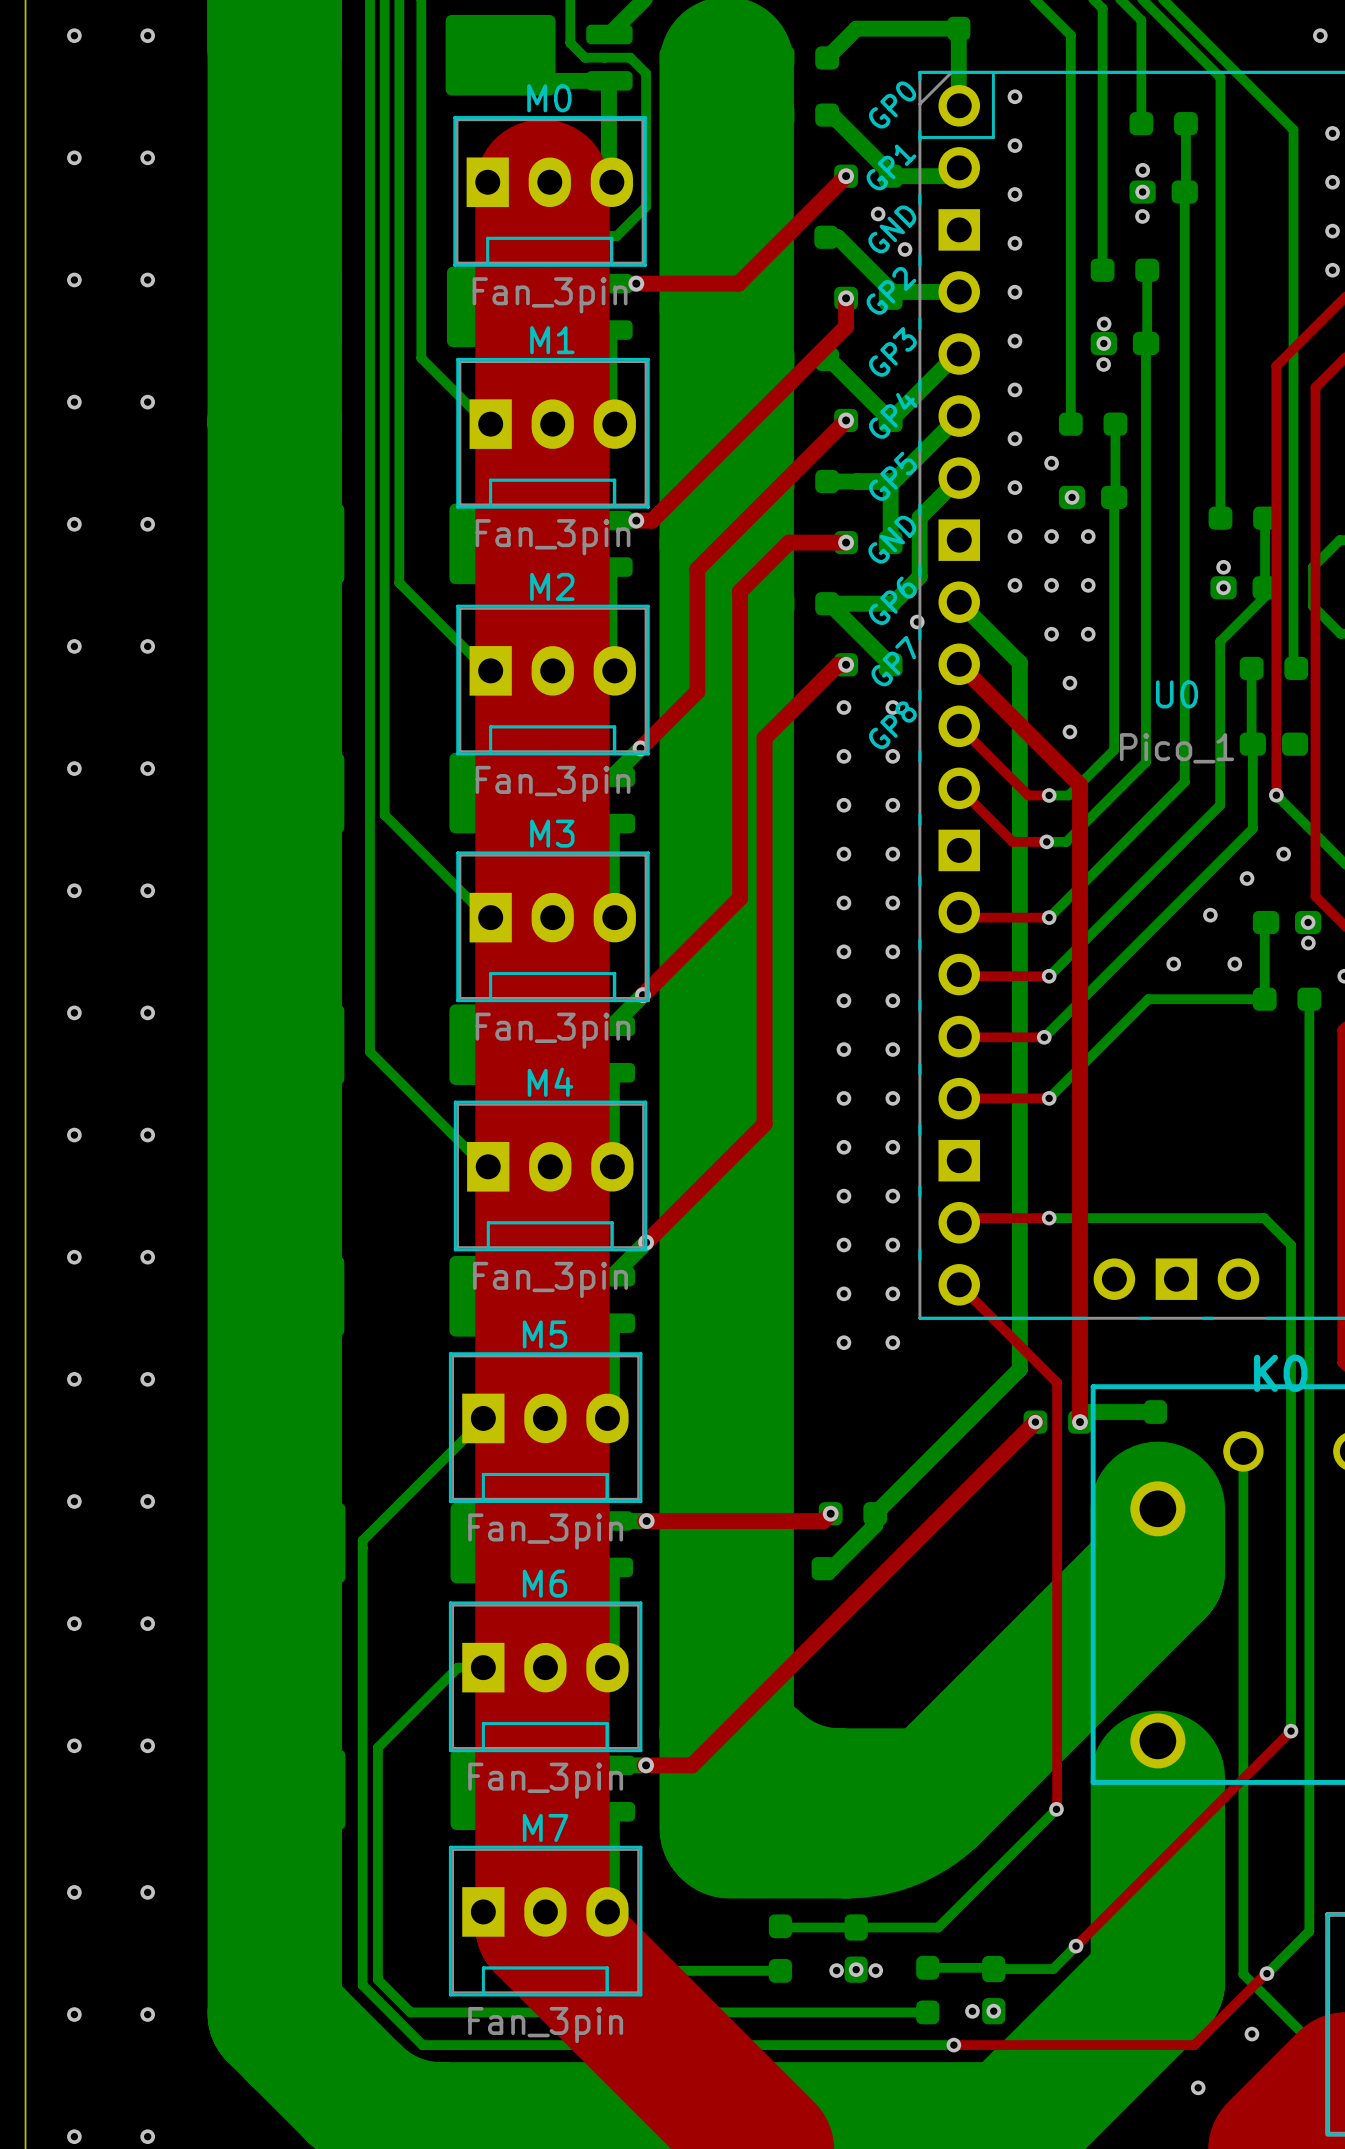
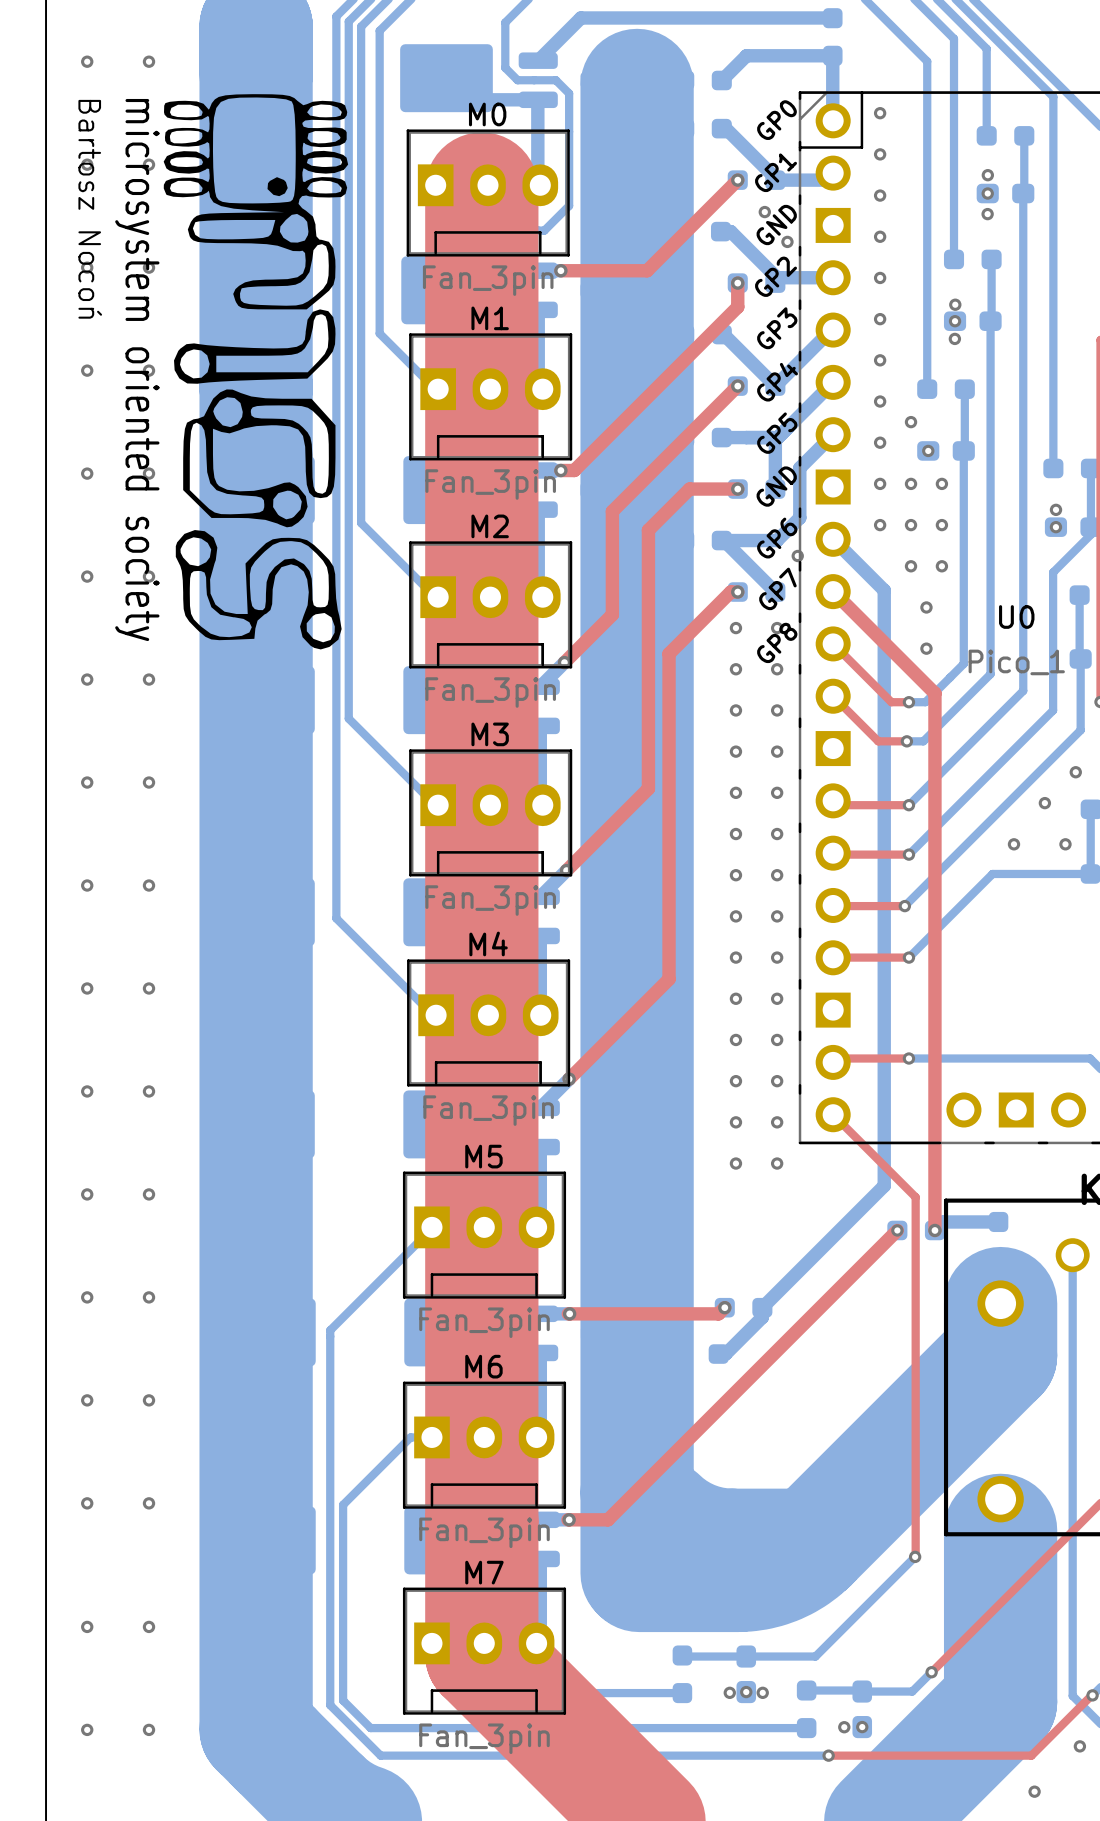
drawing: none -> [163, 94, 349, 650]
text: none -> Bartosz Nocoń (90, 209)
text: none -> microsystem oriented society (137, 370)

